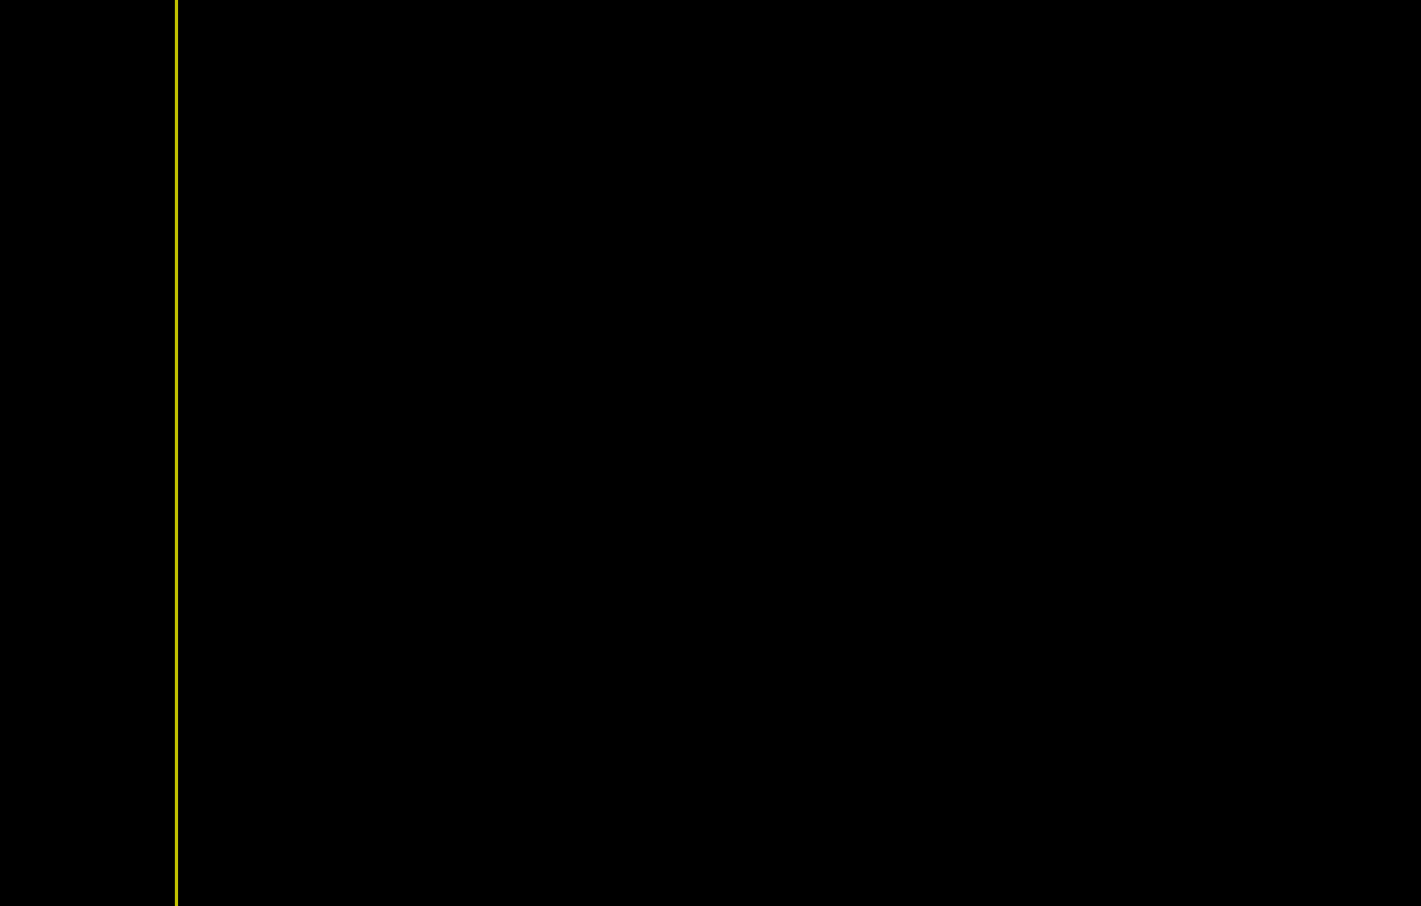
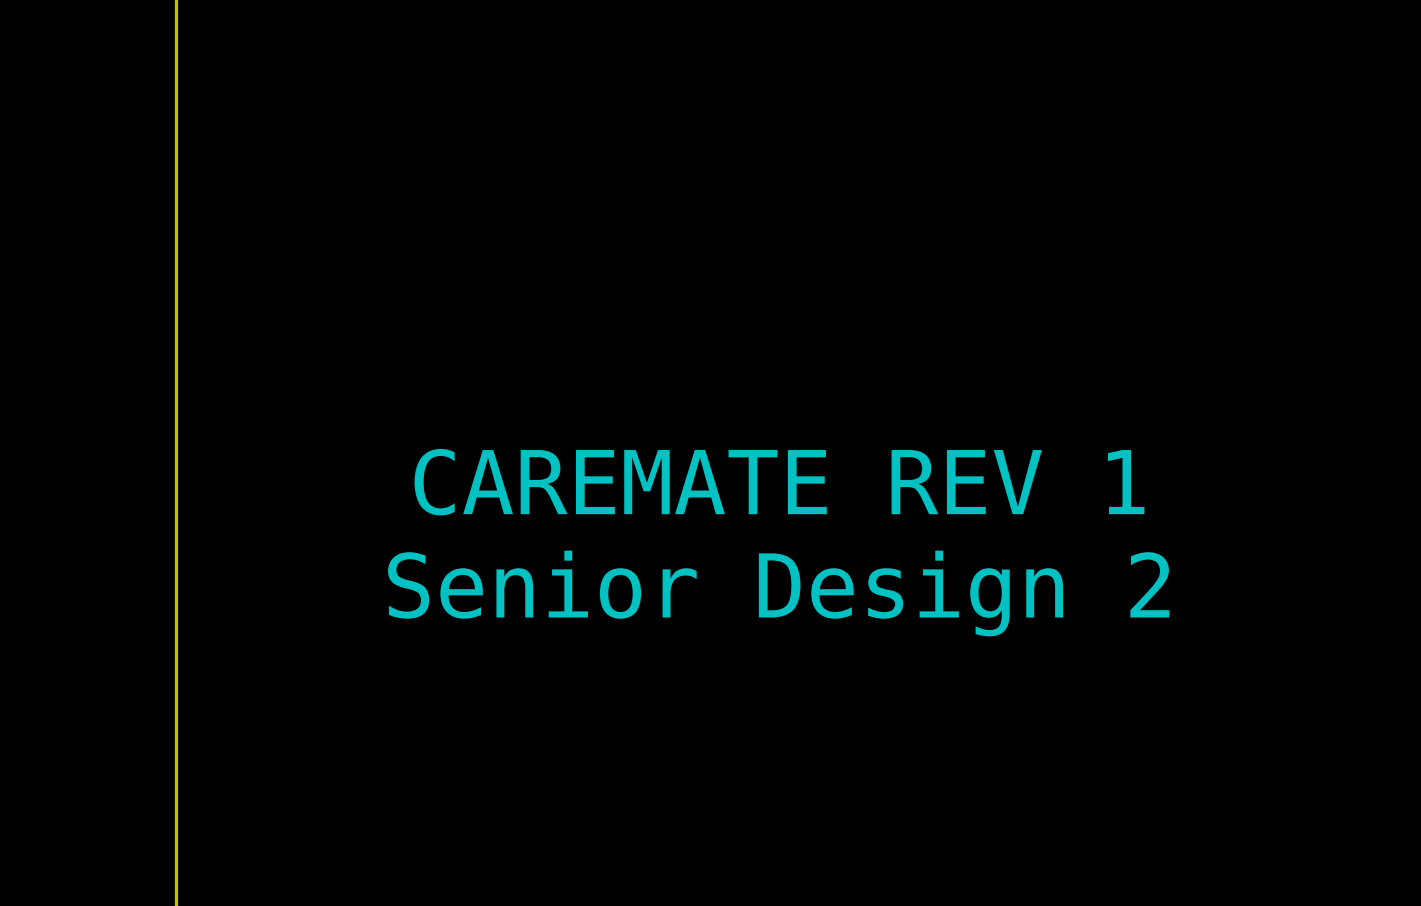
text: none -> CAREMATE REV 1 (779, 482)
text: none -> Senior Design 2 (778, 593)

